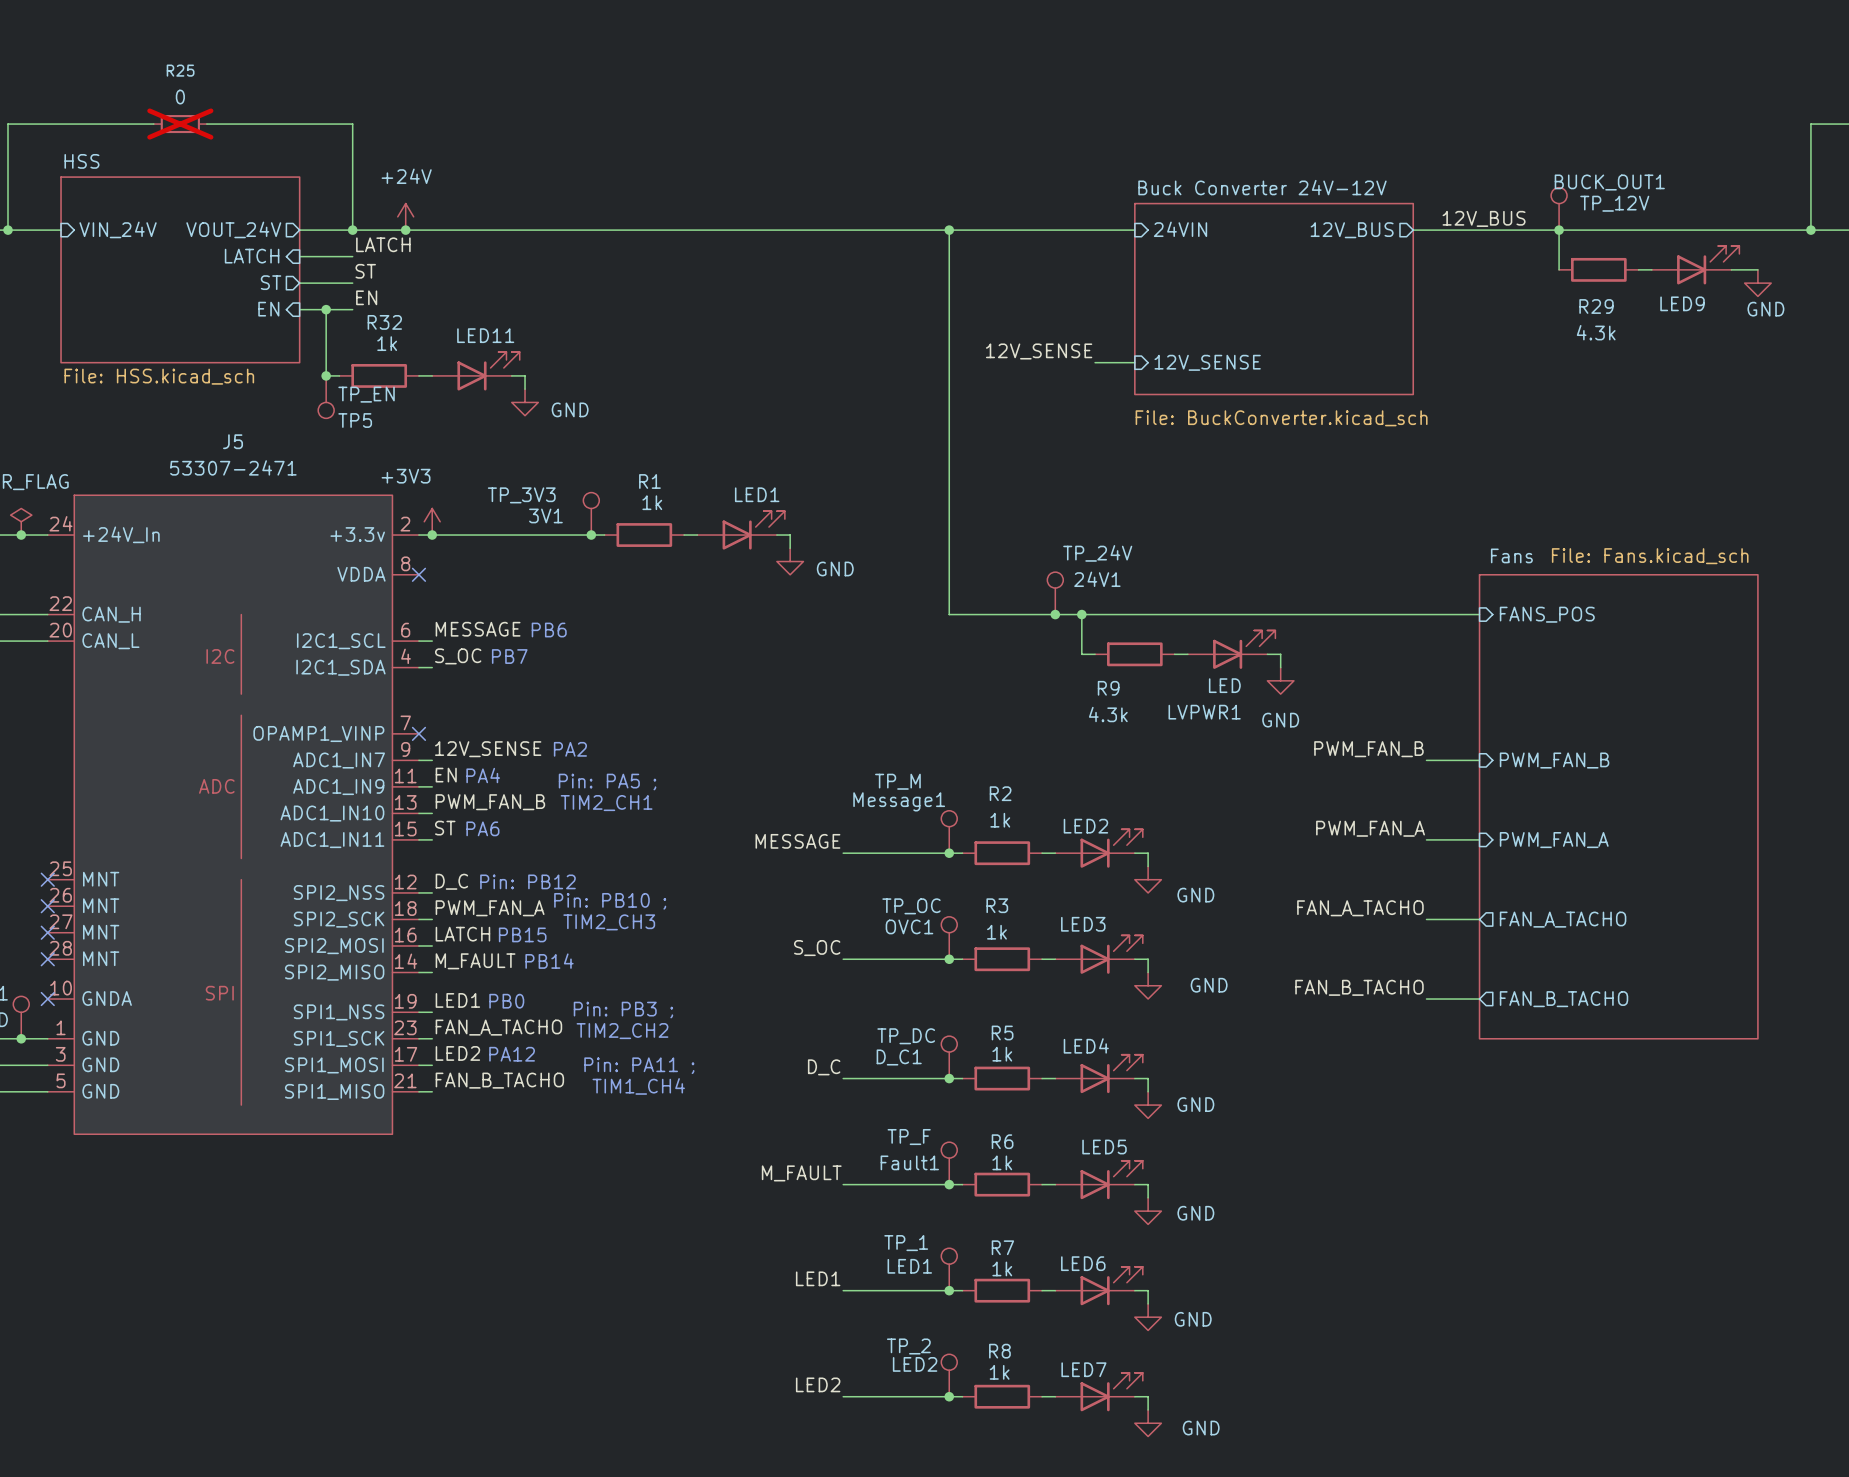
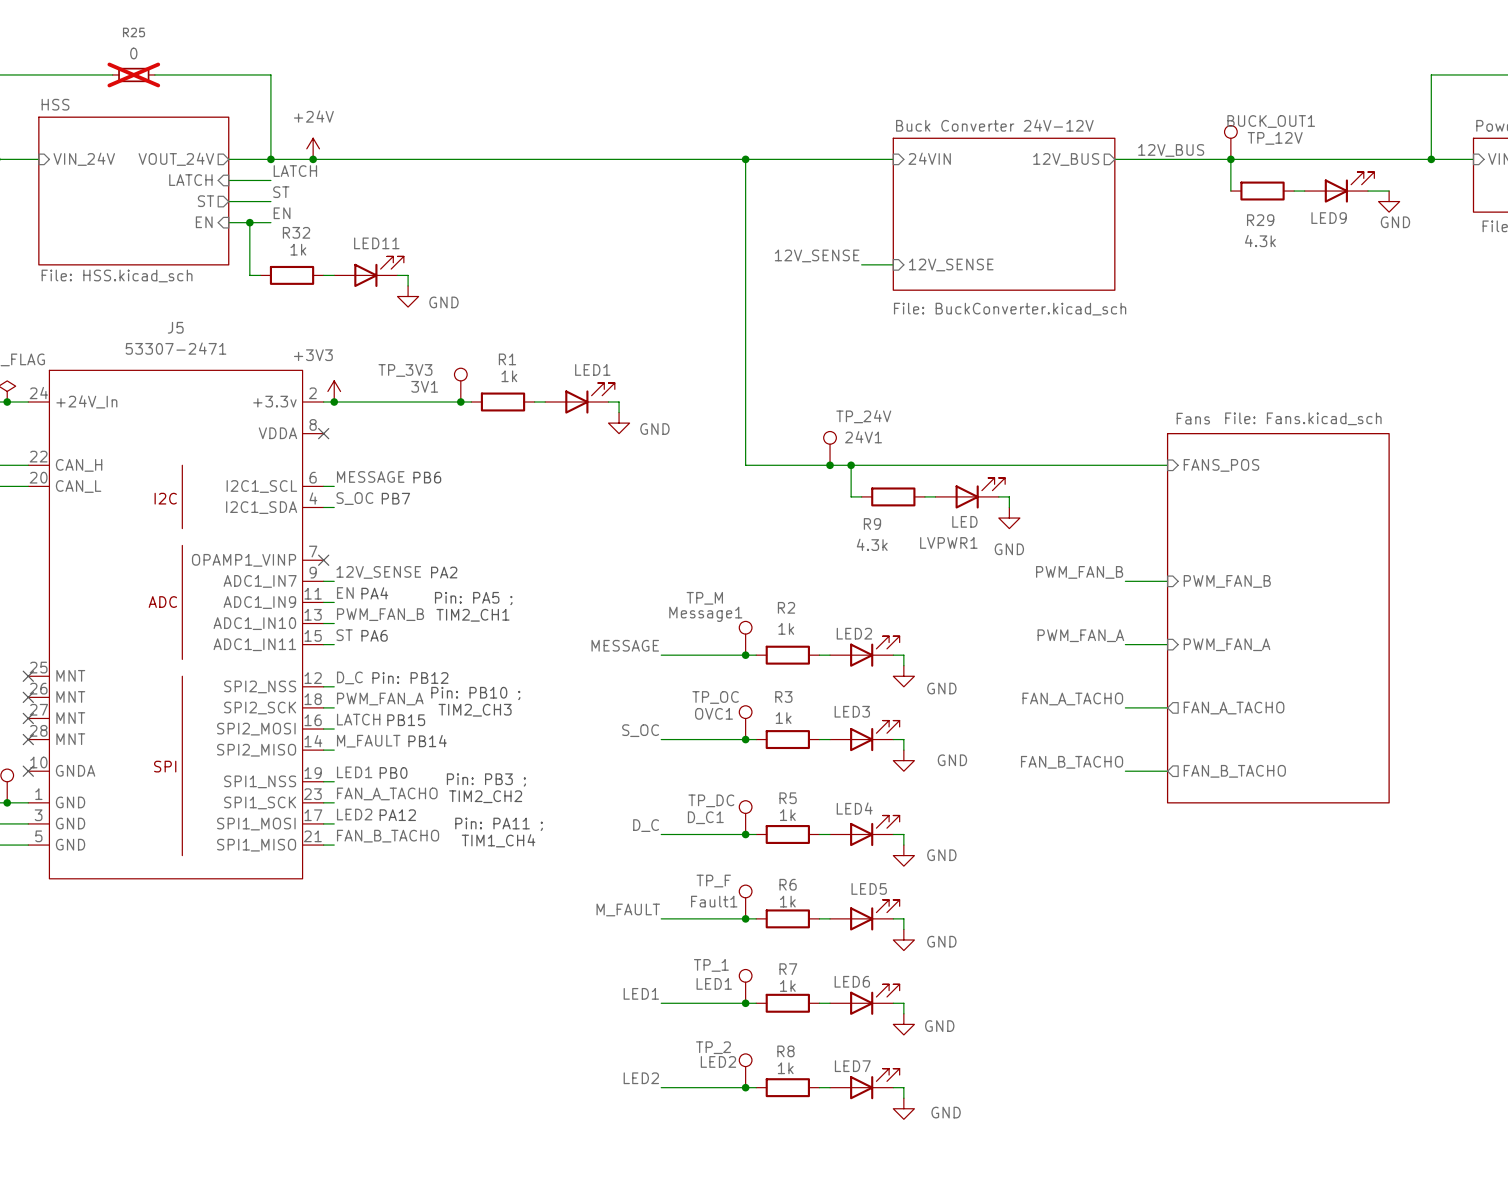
junction: (326, 375) -> none
TP5: TP_EN (326, 397) -> none

